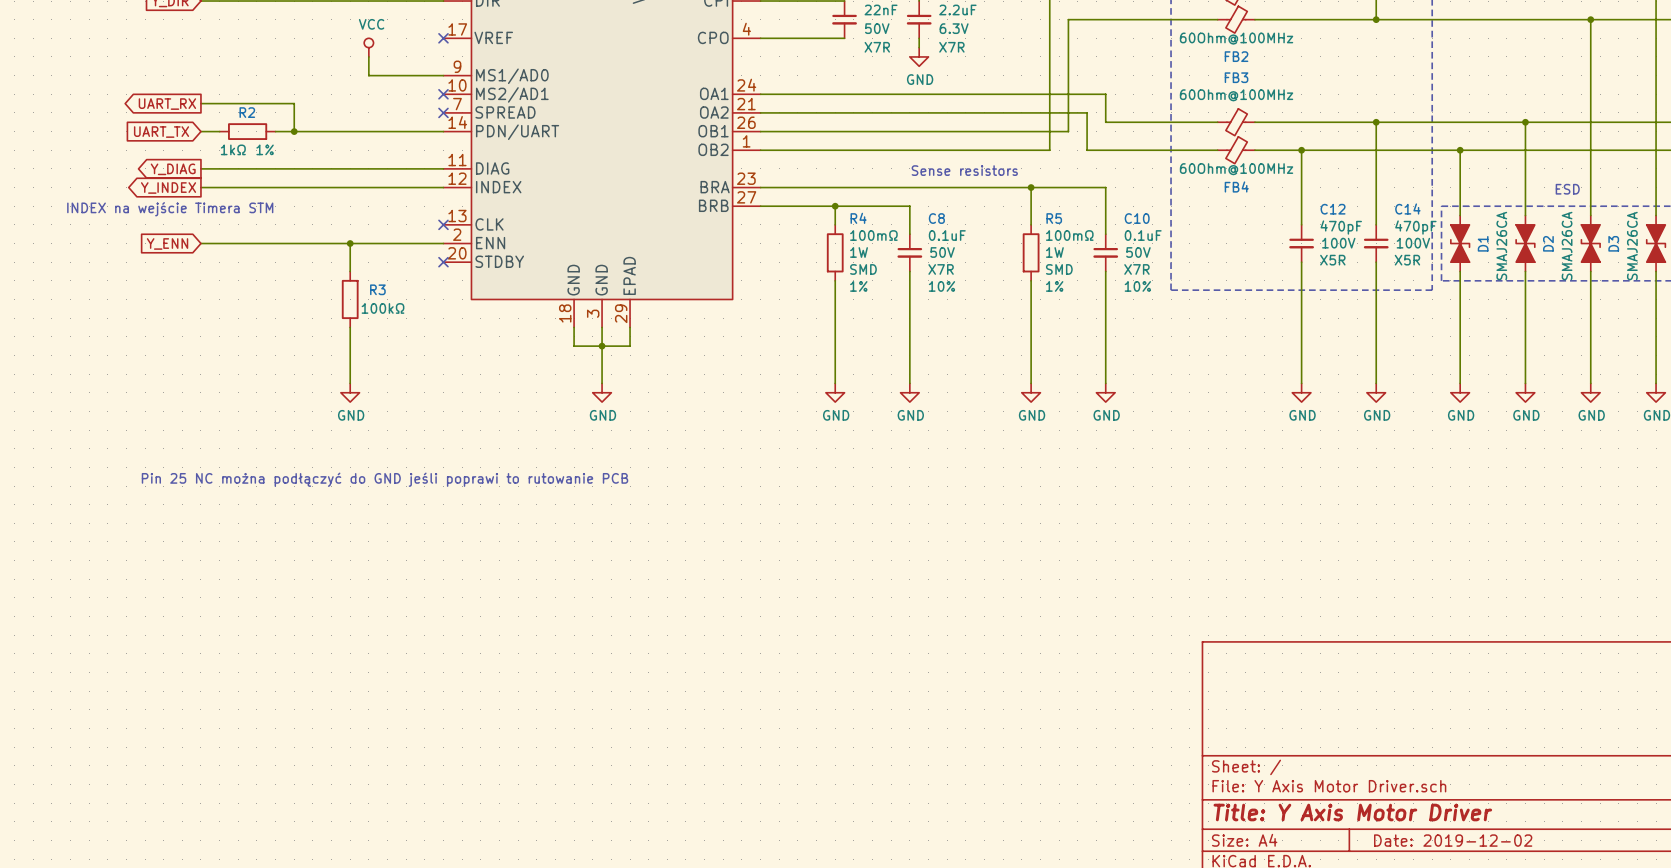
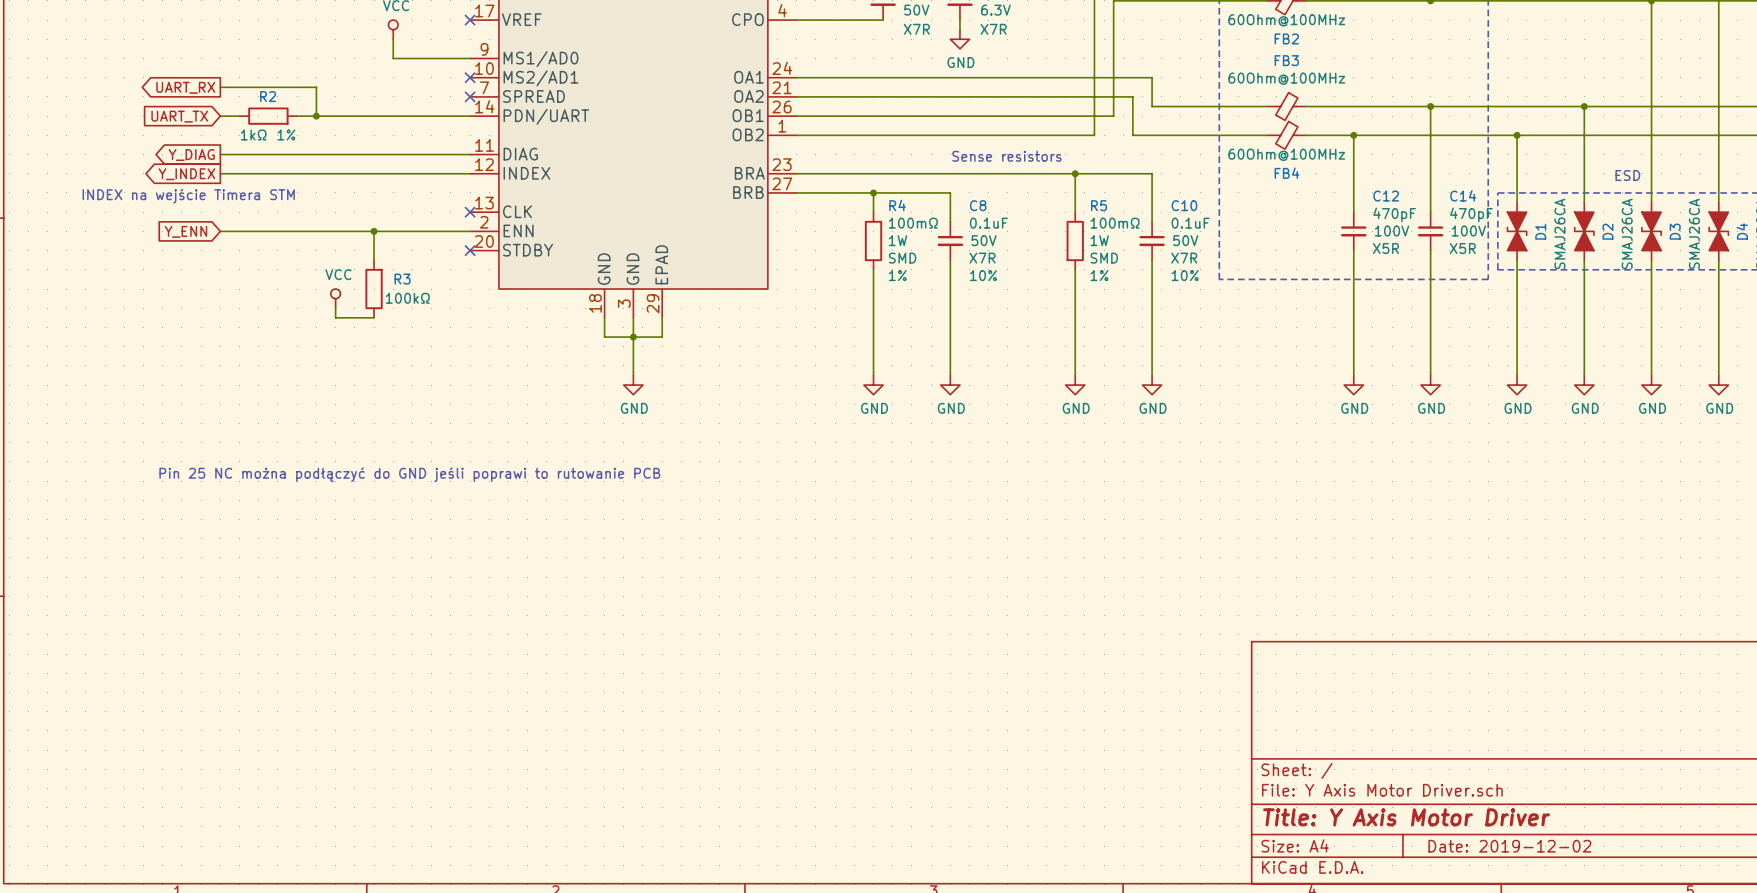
power symbol: none -> VCC (335, 298)
wire: (350, 327) (350, 383) -> (374, 317) (335, 317) (335, 308)
power symbol: GND (350, 392) -> none

